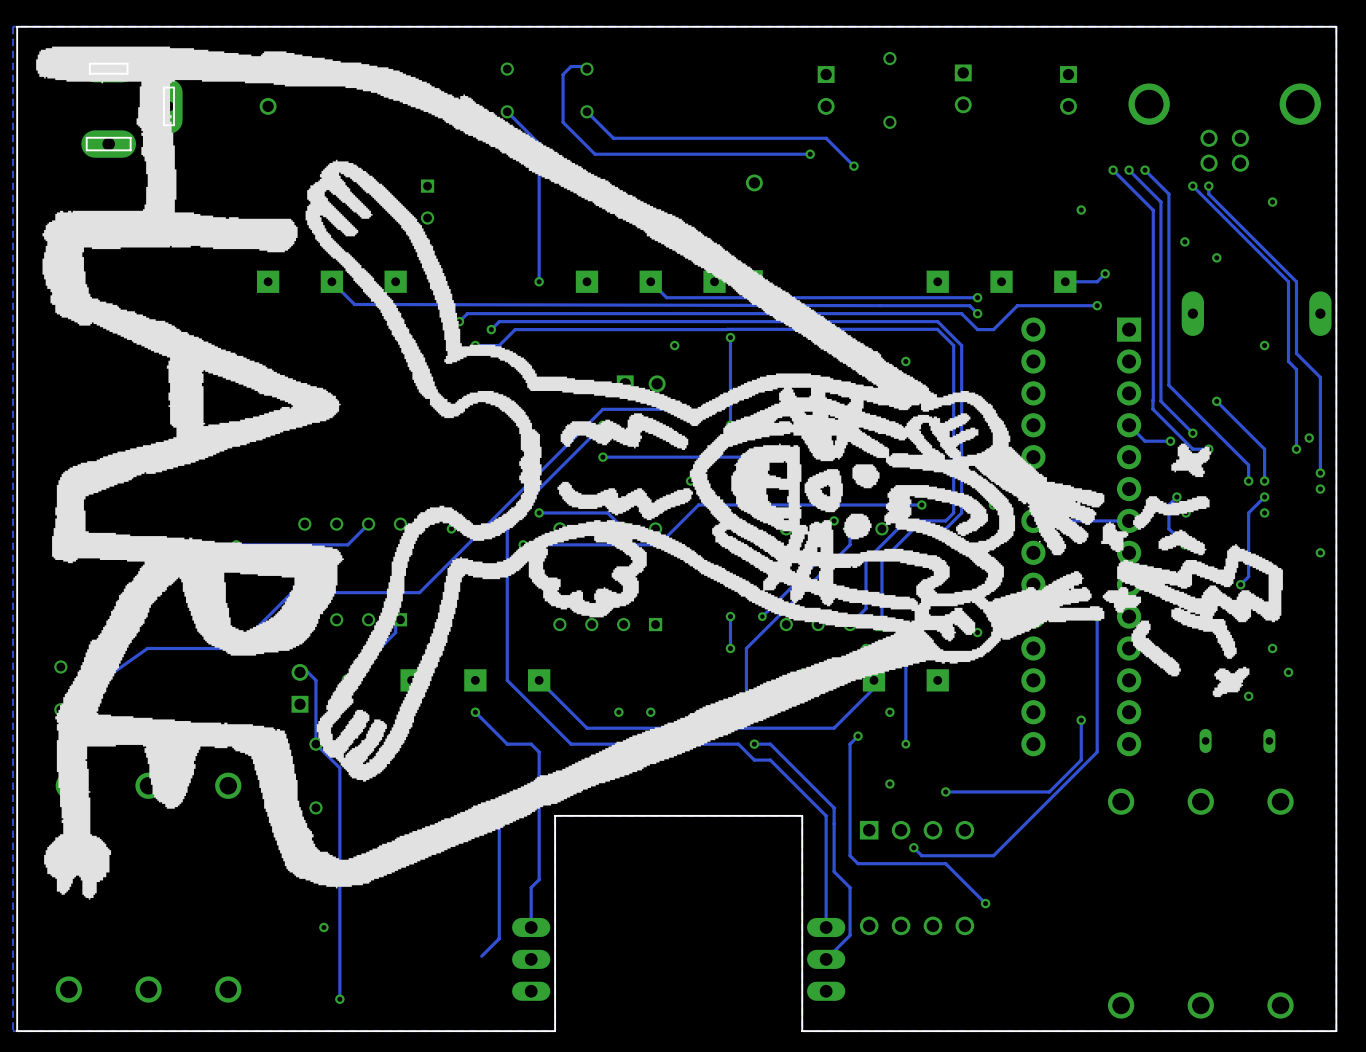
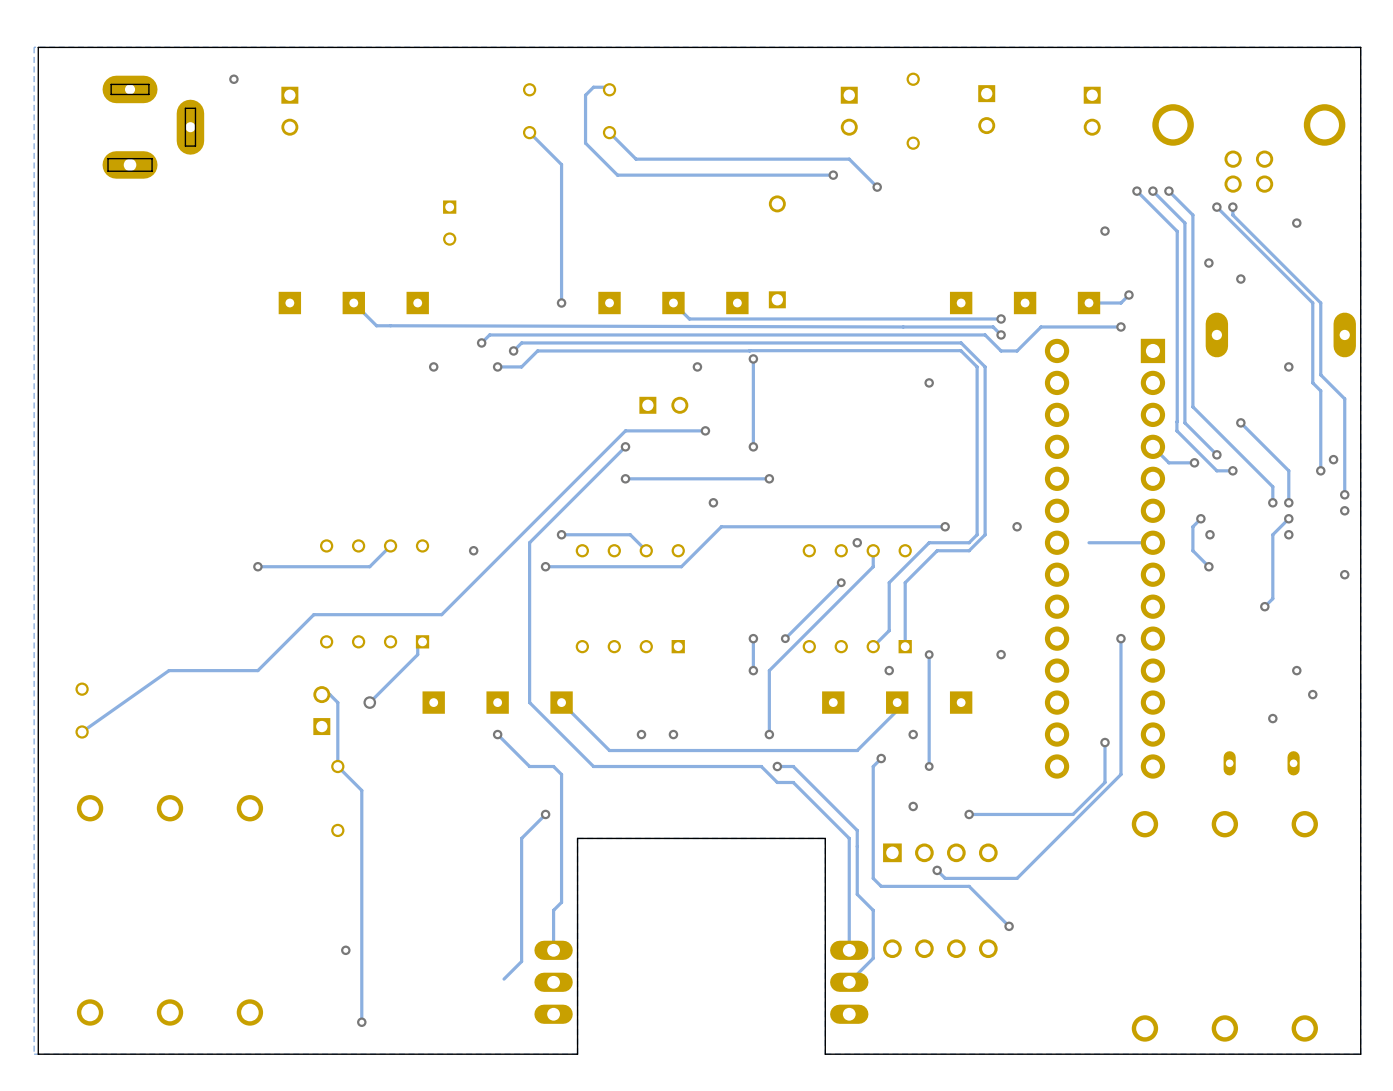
drawing: [36, 46, 1283, 900] -> none
drawing: [1171, 443, 1212, 478] -> none

